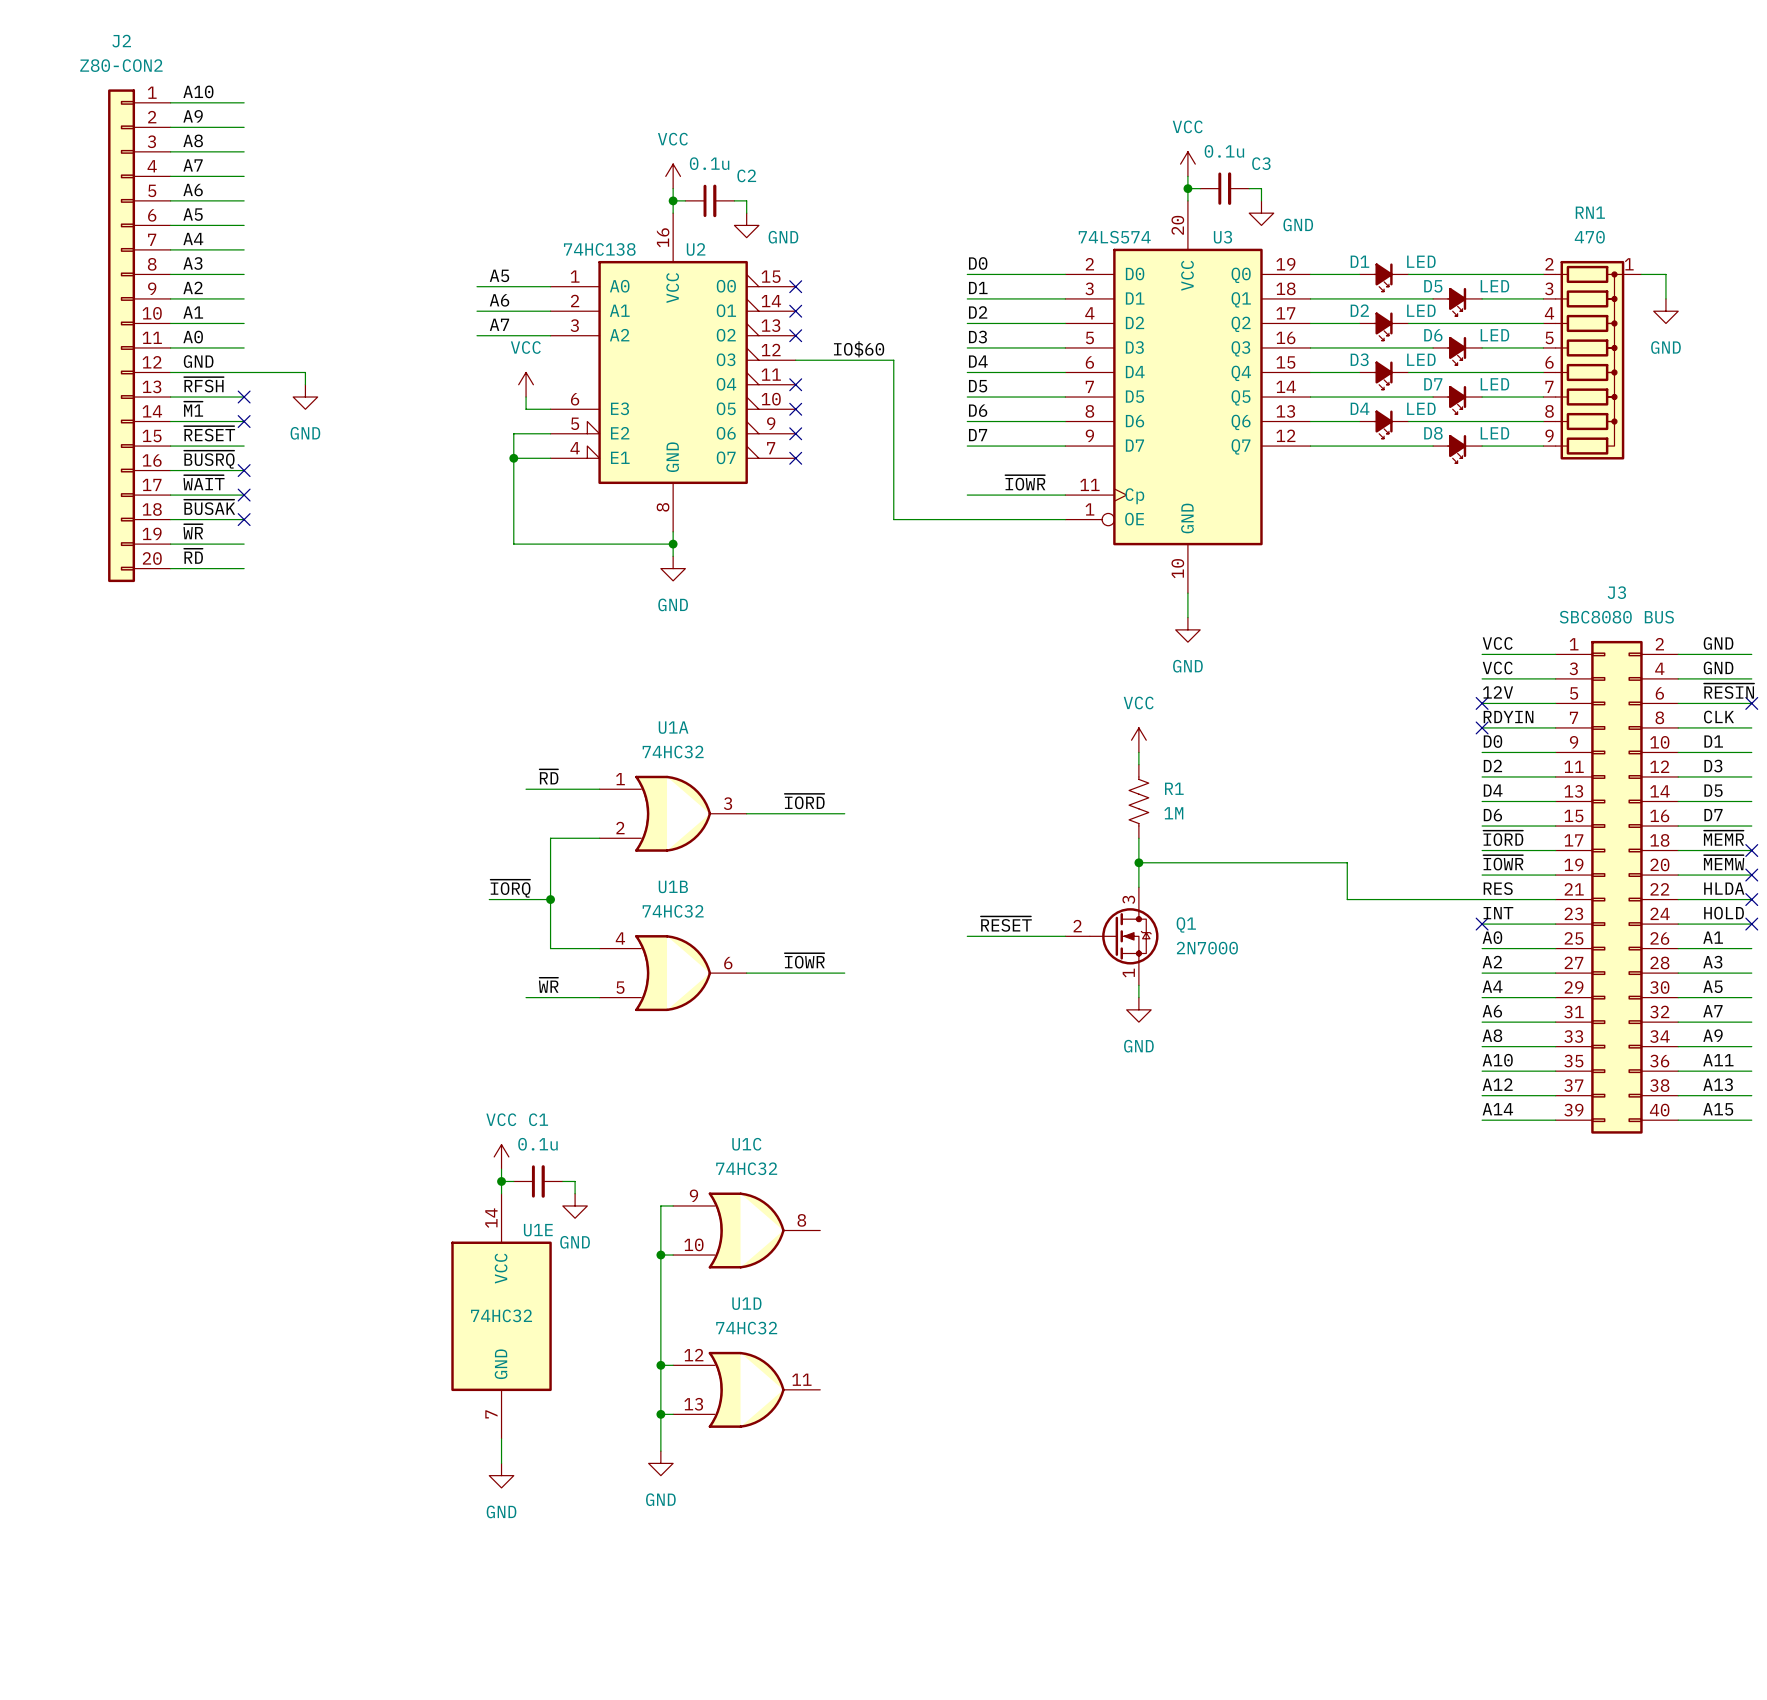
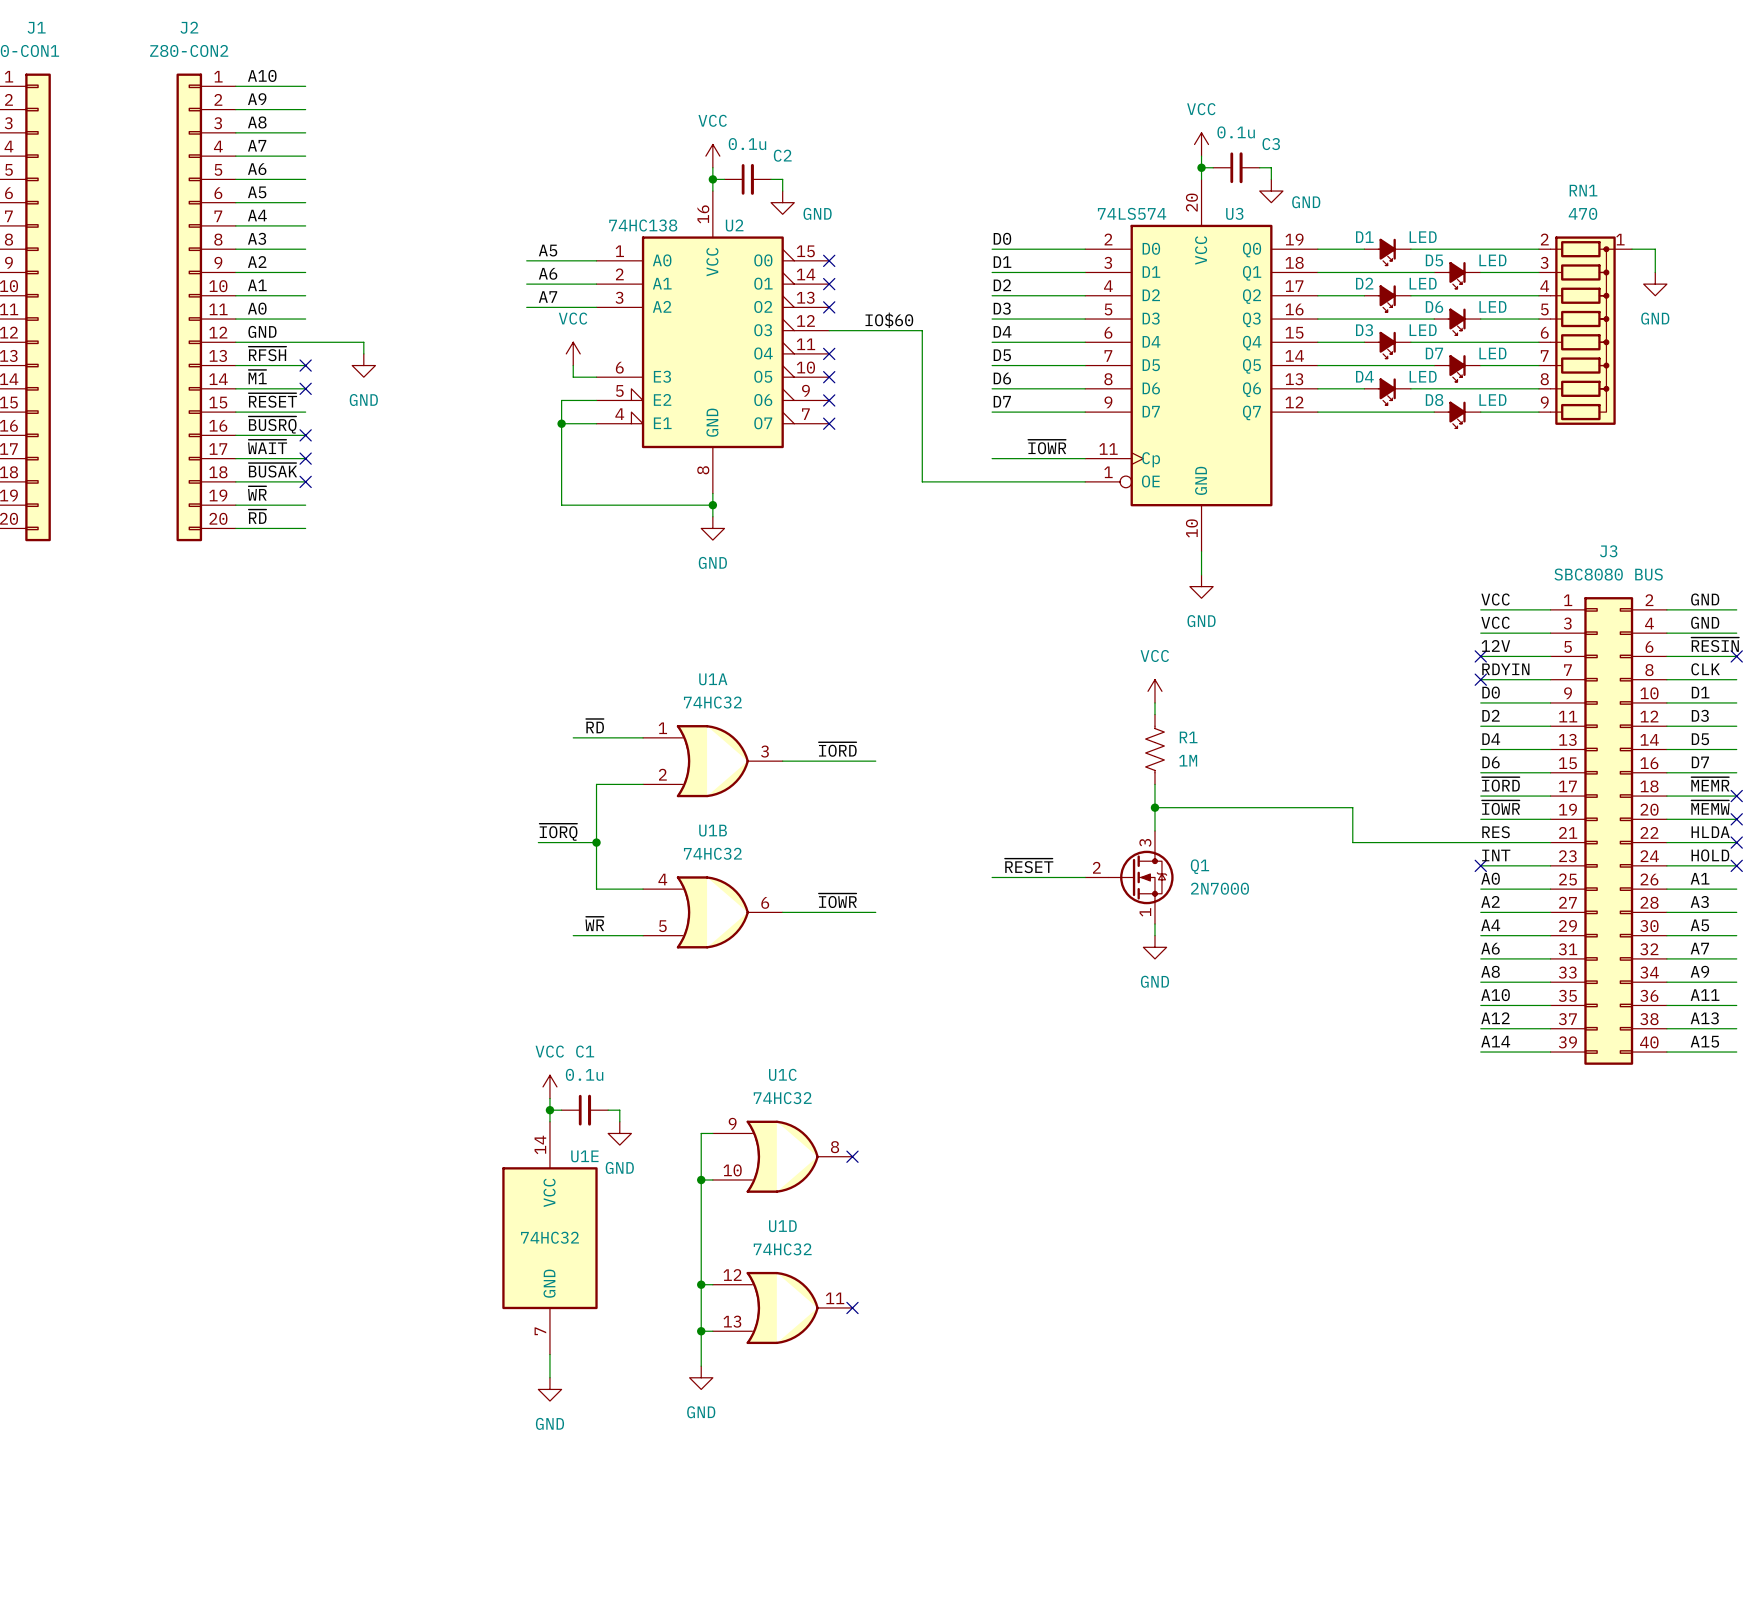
no-connect mark: none -> (852, 1156)
no-connect mark: none -> (852, 1307)

